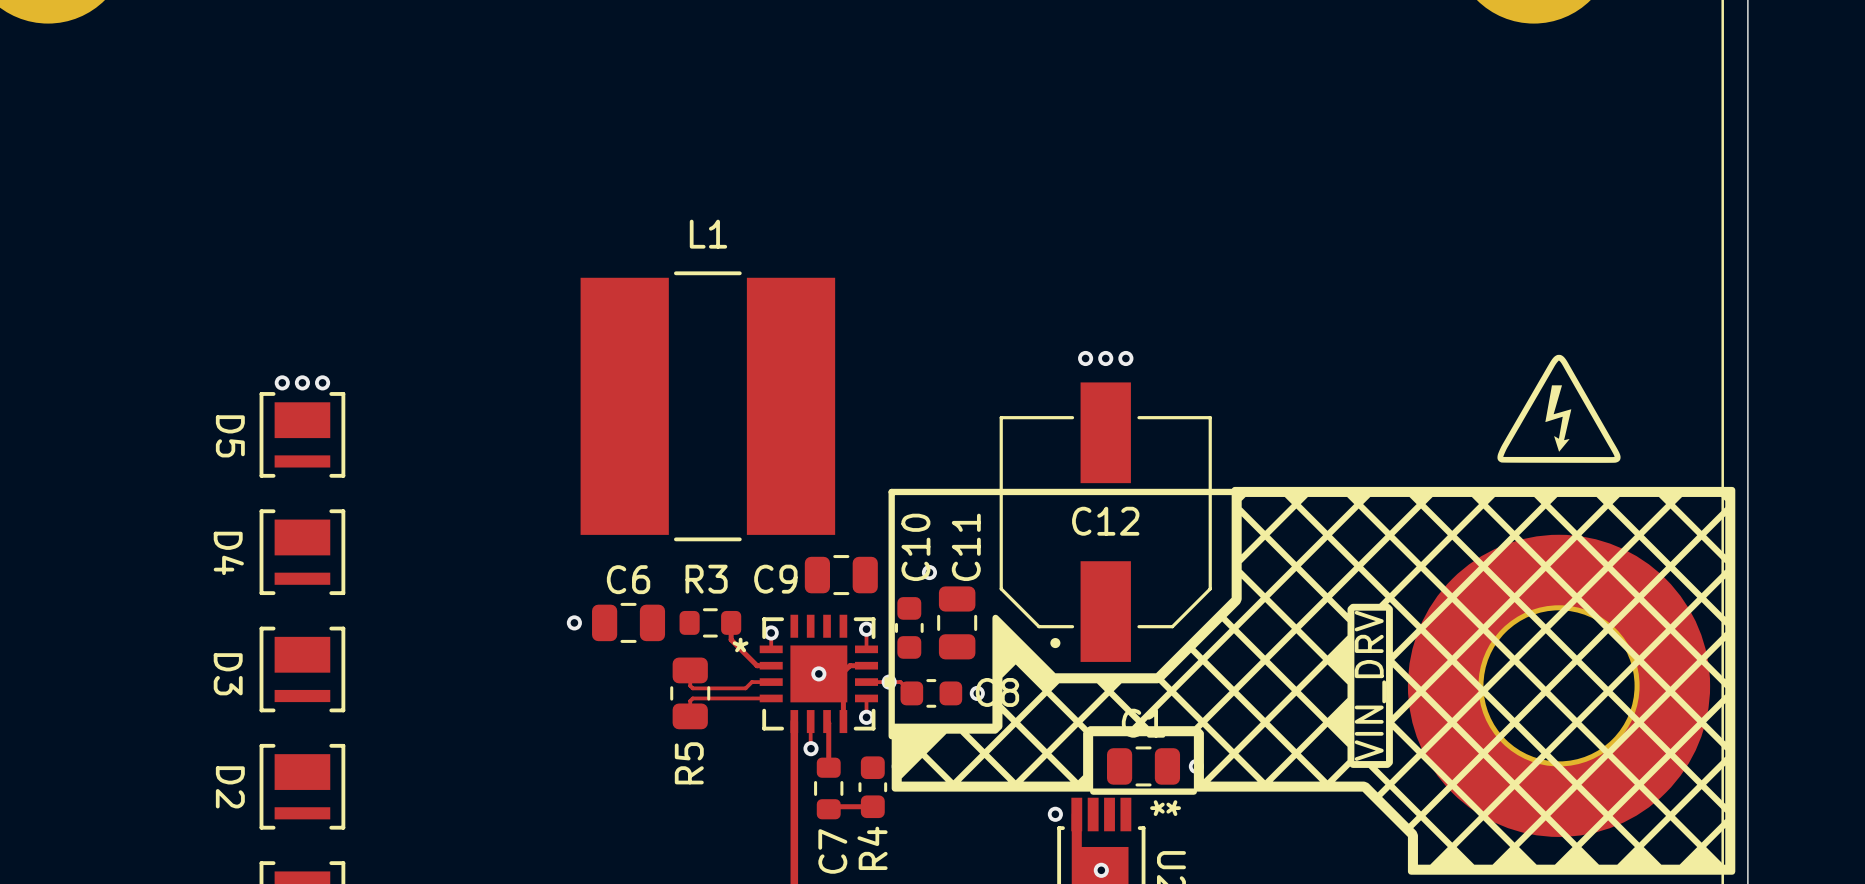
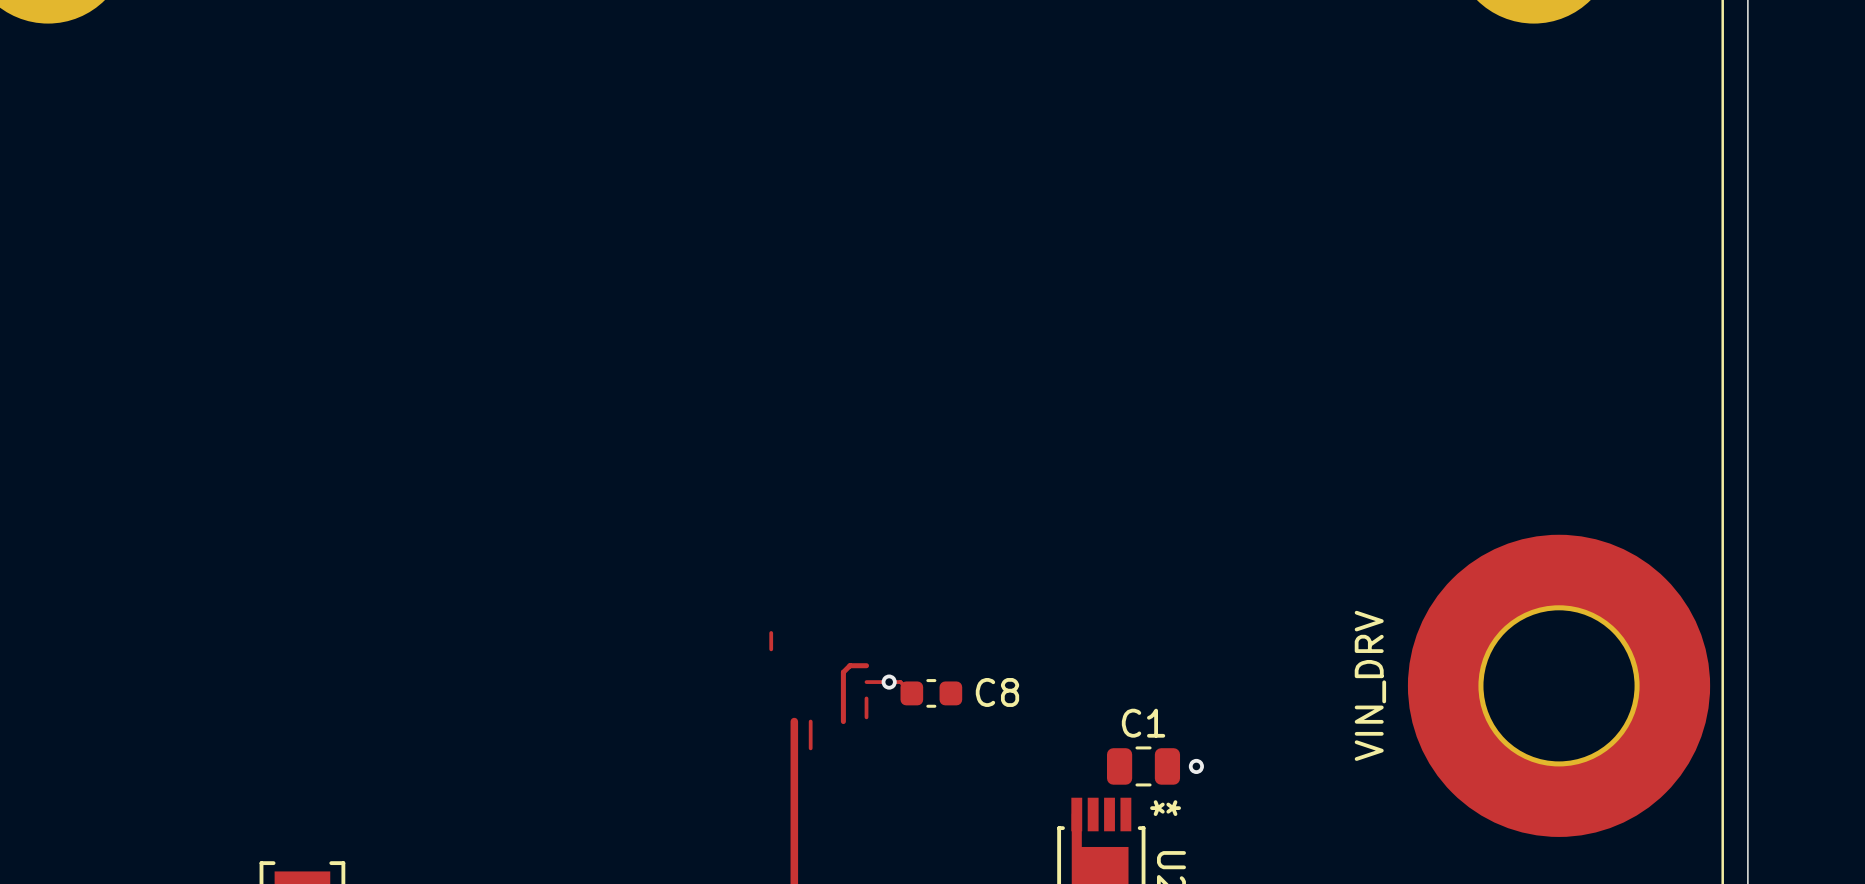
drawing: [891, 354, 1736, 875] -> none
via: (1085, 358) -> none
via: (1105, 358) -> none
via: (1125, 358) -> none
via: (282, 382) -> none
via: (302, 382) -> none
via: (322, 382) -> none
L1: (707, 406) -> none
D5: (302, 434) -> none
line: (1395, 491) (891, 491) (891, 736) -> none
C12: (1105, 522) -> none
D4: (302, 552) -> none
via: (929, 572) -> none
C9: (841, 575) -> none
via: (574, 622) -> none
C6: (628, 622) -> none
R3: (710, 622) -> none
track: (731, 622) (731, 639) (757, 665) (771, 665) -> none
C11: (957, 622) -> none
C10: (909, 627) -> none
track: (866, 629) (866, 649) -> none
via: (866, 629) -> none
via: (771, 632) -> none
D3: (302, 669) -> none
track: (690, 670) (690, 685) (692, 688) (745, 688) (751, 682) (771, 682) -> none
via: (818, 673) -> none
part: (825, 673) -> none
R5: (690, 693) -> none
via: (977, 693) -> none
track: (771, 698) (692, 698) (690, 700) (690, 716) -> none
via: (866, 717) -> none
track: (827, 721) (828, 723) (828, 767) -> none
via: (811, 748) -> none
D2: (302, 786) -> none
C7: (872, 787) -> none
R4: (828, 788) -> none
line: (1093, 791) (1193, 791) -> none
track: (872, 806) (831, 806) (828, 809) -> none
via: (1055, 814) -> none
via: (1101, 870) -> none

